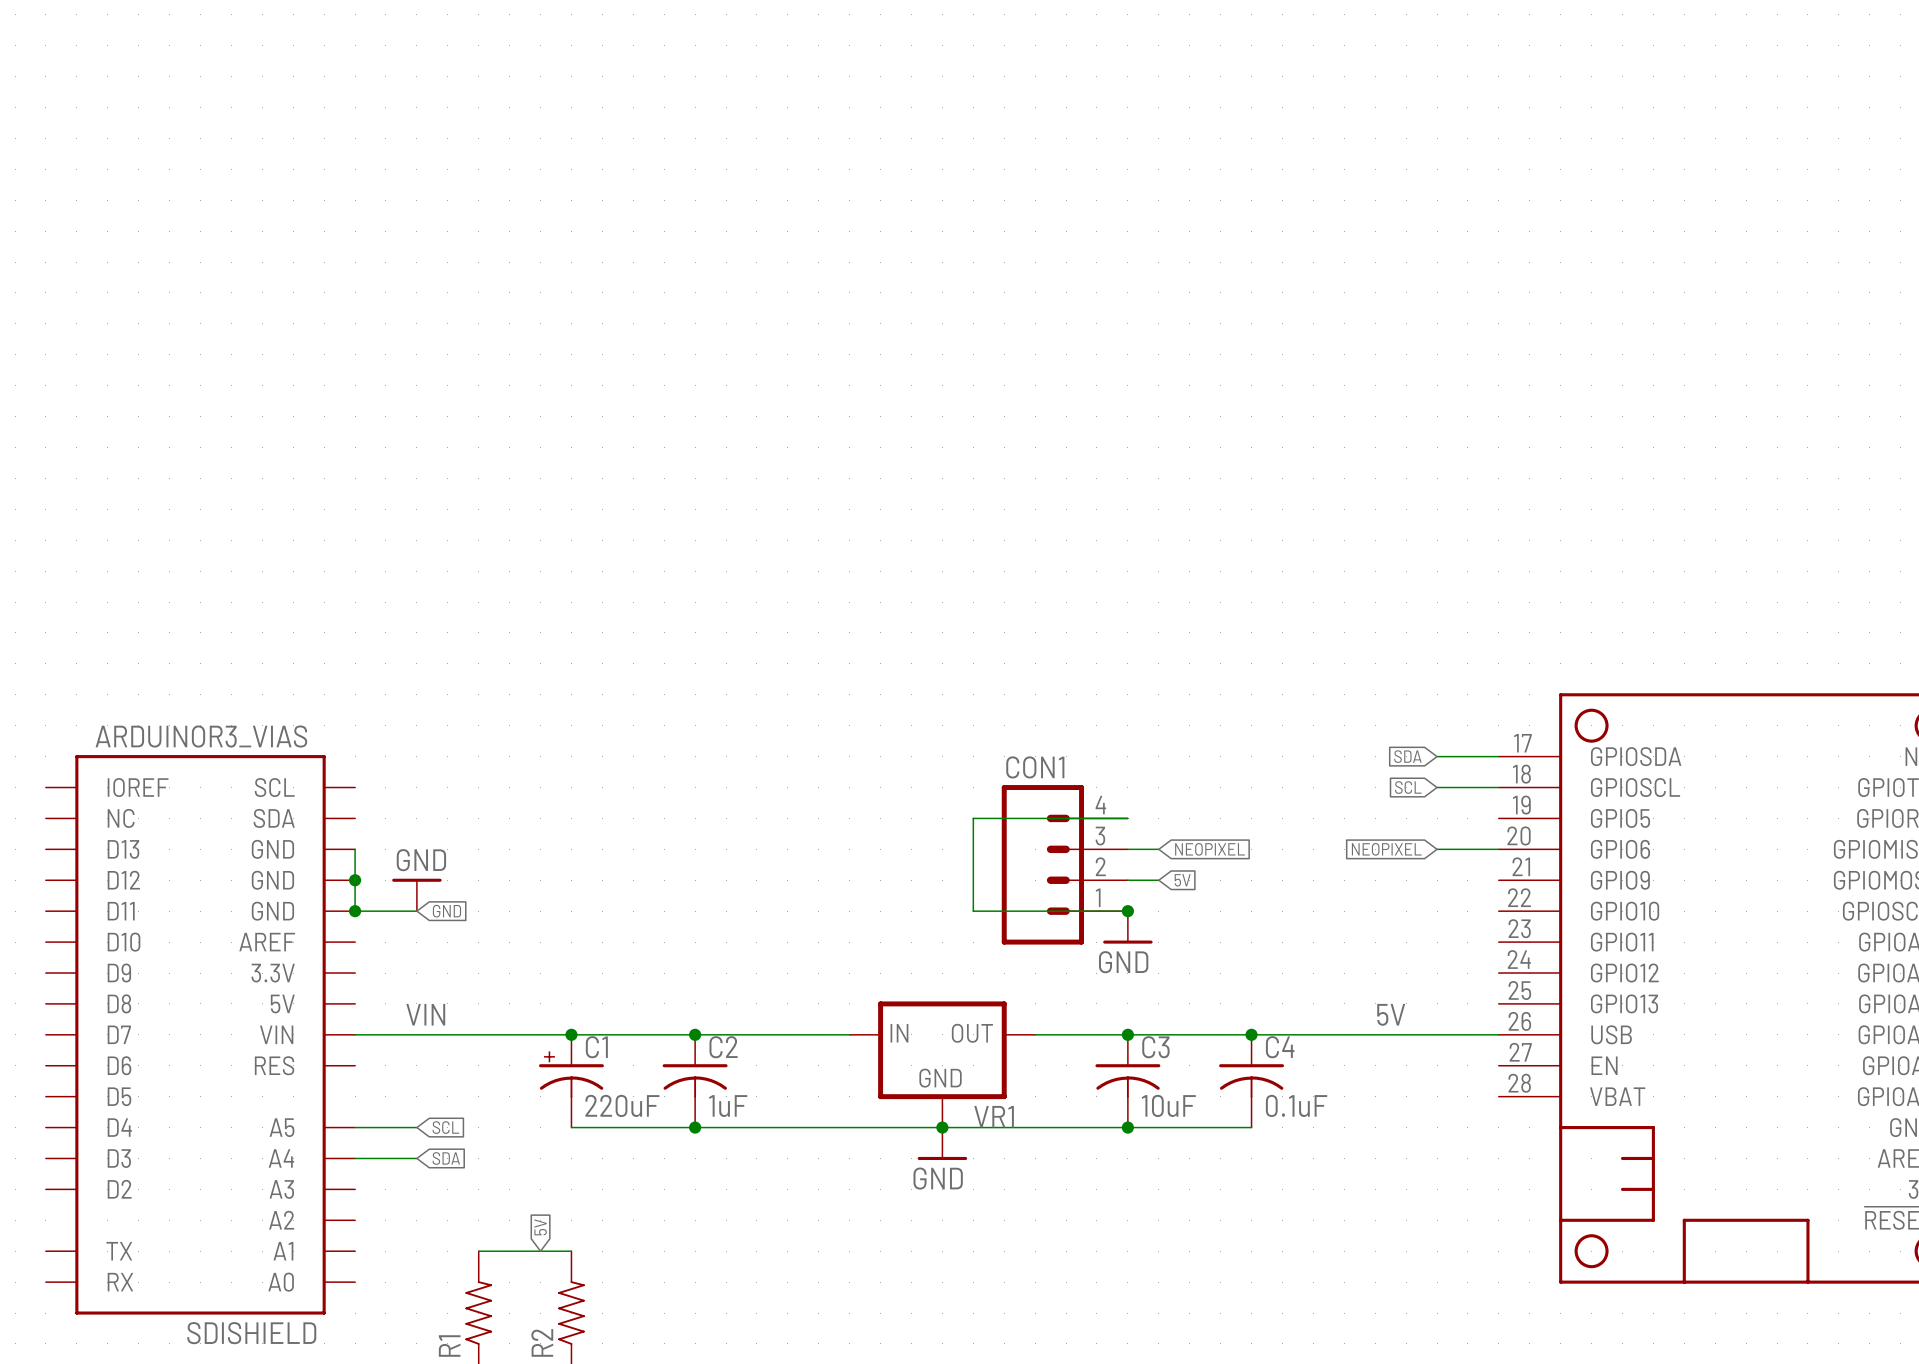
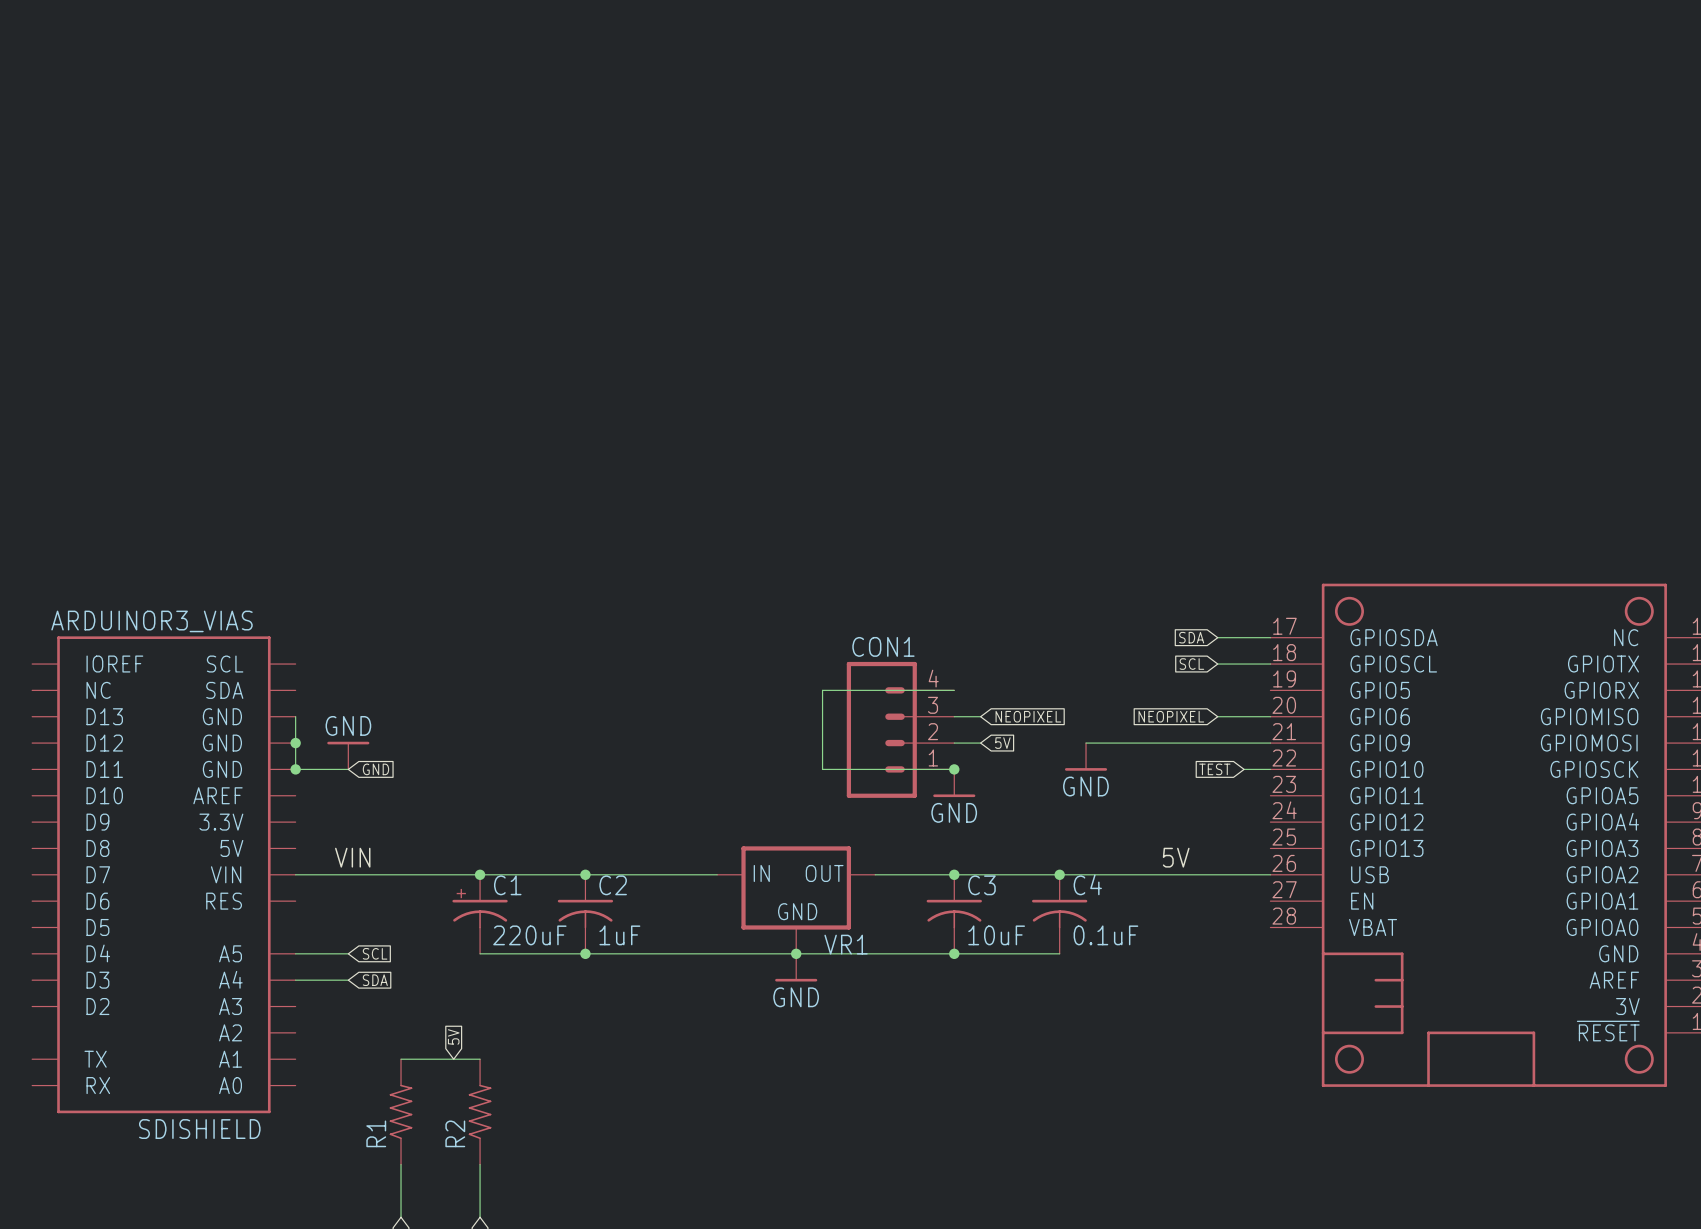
wire: none -> (1086, 743) (1270, 743)
power symbol: none -> GND (1086, 756)
global label: none -> TEST (1214, 769)
wire: none -> (1244, 769) (1270, 769)

